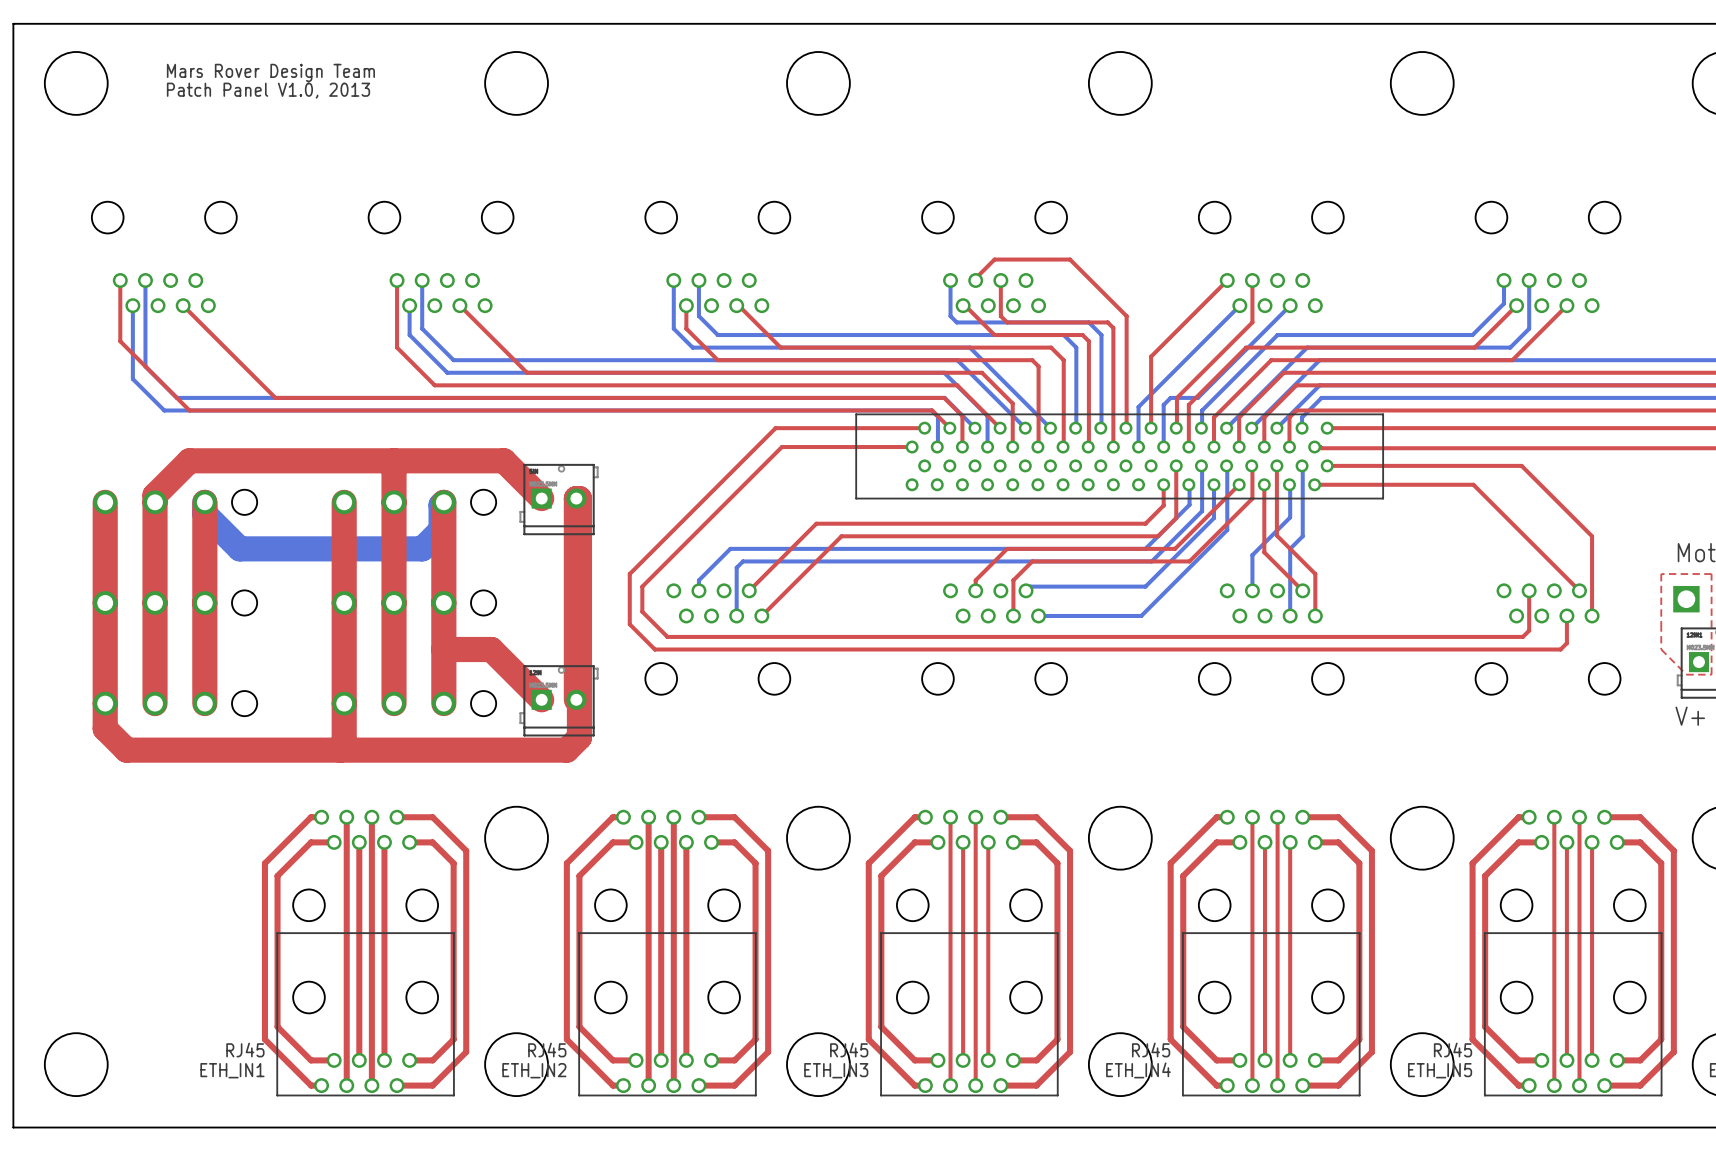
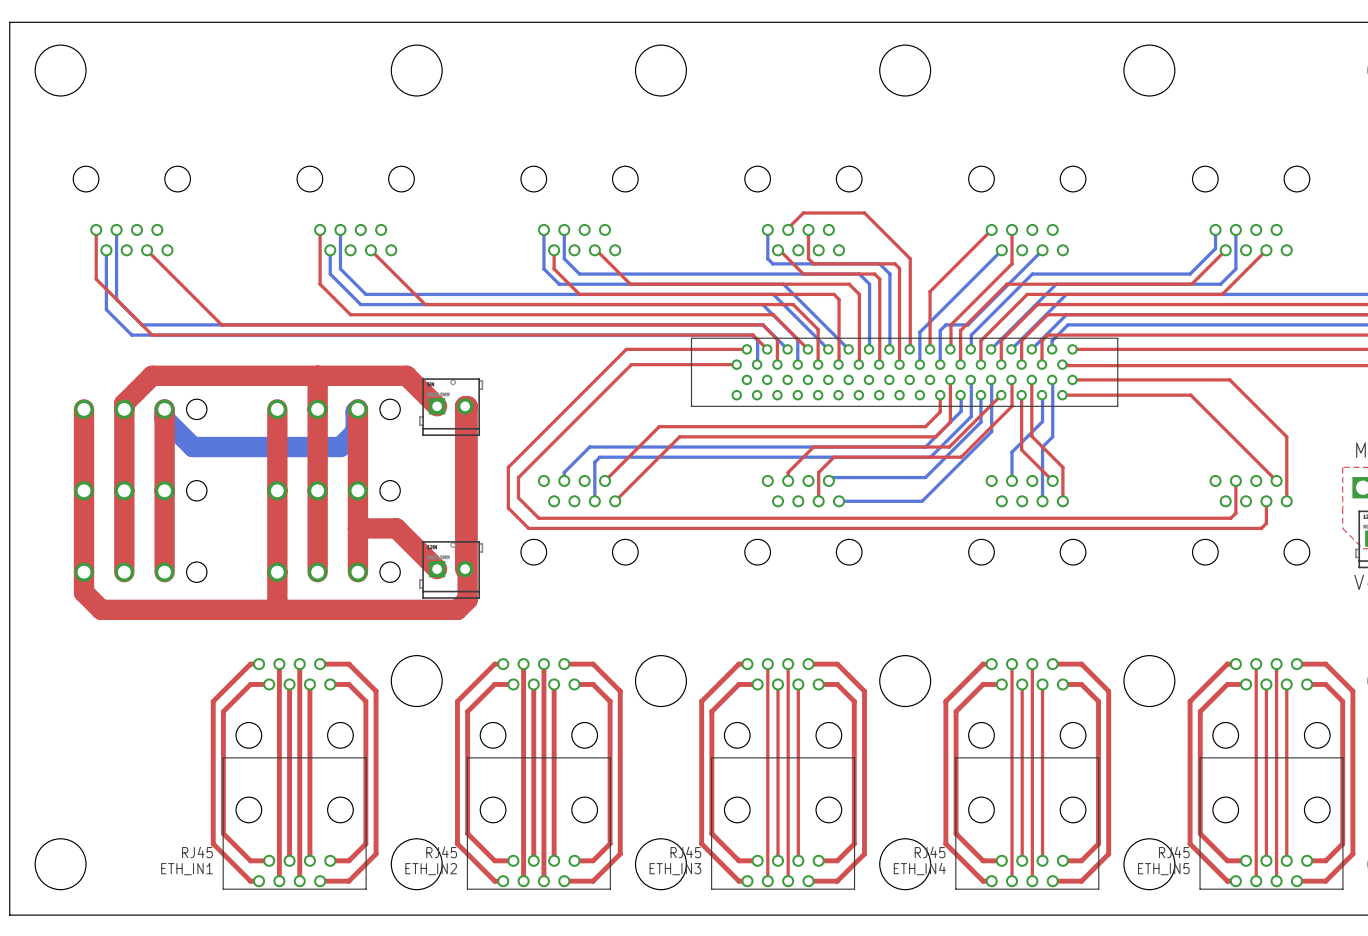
text: Mars Rover Design Team (270, 72) -> none
text: Patch Panel V1.0, 2013 (268, 90) -> none

